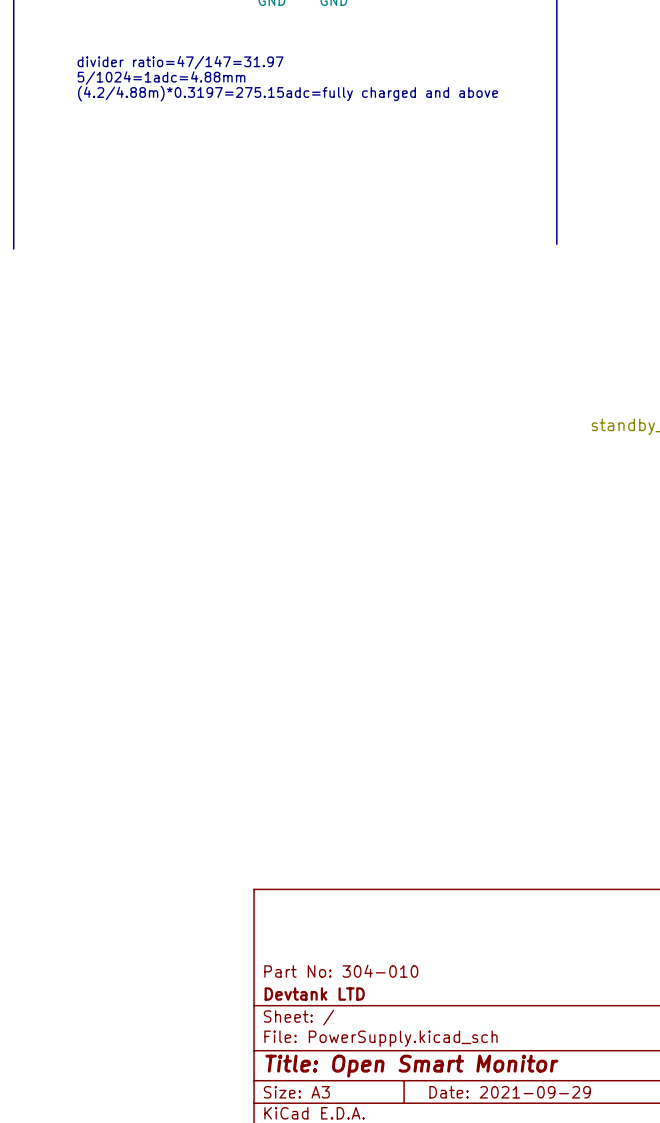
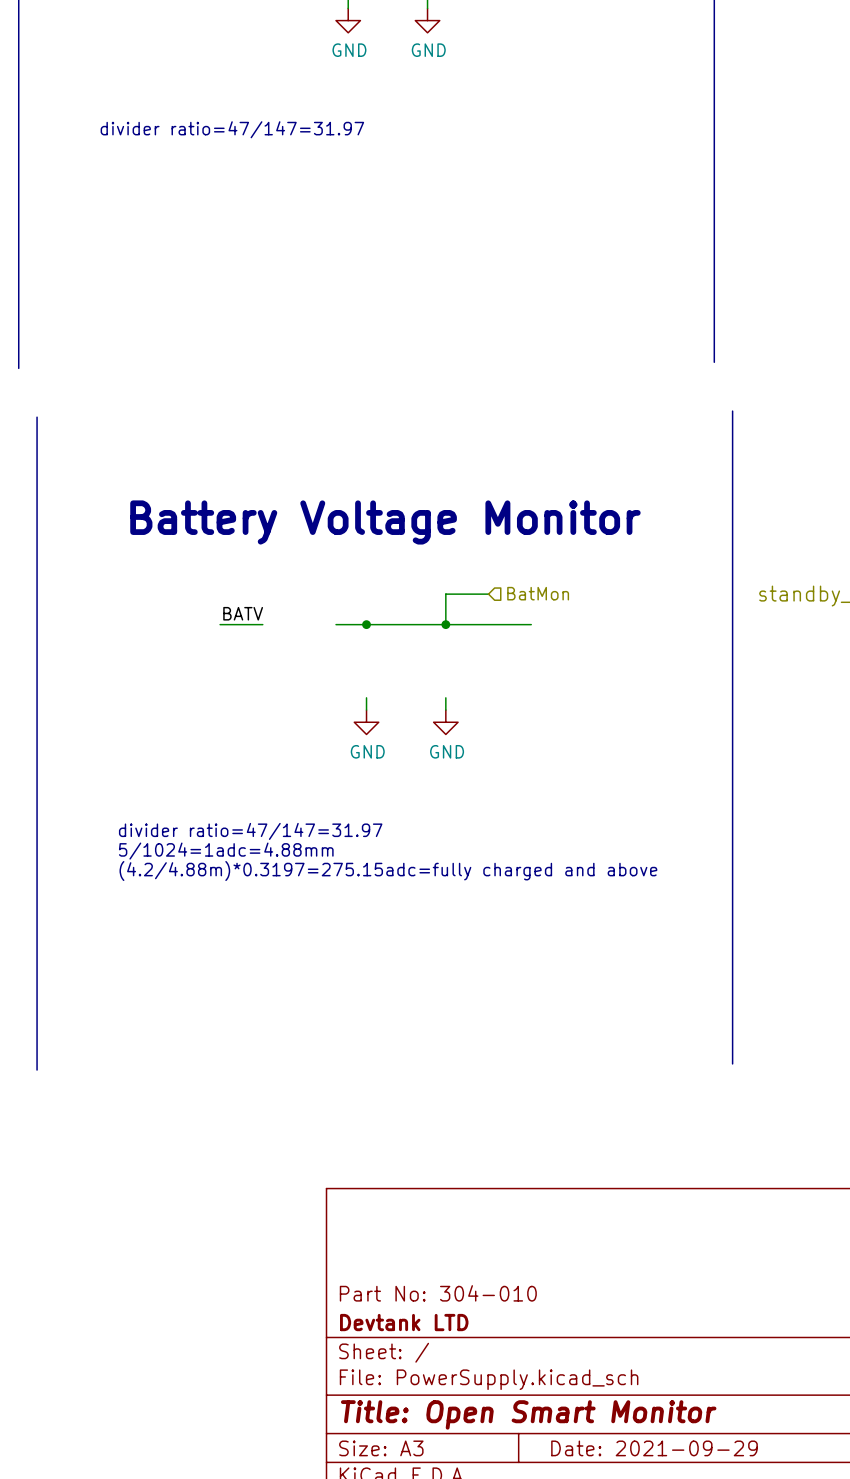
text: 5/1024=1adc=4.88mm (161, 78) -> none
text: (4.2/4.88m)*0.3197=275.15adc=fully charged and above (288, 93) -> none
line: none -> (732, 411) (732, 1063)
line: none -> (37, 417) (37, 1070)
text: none -> Battery Voltage Monitor (385, 522)
hierarchical label: none -> BatMon (538, 593)
wire: none -> (488, 594) (445, 594) (445, 624)
label: none -> BATV (243, 613)
wire: none -> (220, 624) (262, 624)
wire: none -> (336, 624) (531, 624)
junction: none -> (366, 624)
junction: none -> (445, 624)
wire: none -> (366, 697) (366, 710)
wire: none -> (445, 697) (445, 710)
power symbol: none -> GND (366, 722)
power symbol: none -> GND (445, 722)
text: none -> divider ratio=47/147=31.97 (250, 831)
text: none -> 5/1024=1adc=4.88mm (226, 851)
text: none -> (4.2/4.88m)*0.3197=275.15adc=fully charged and above (388, 871)

